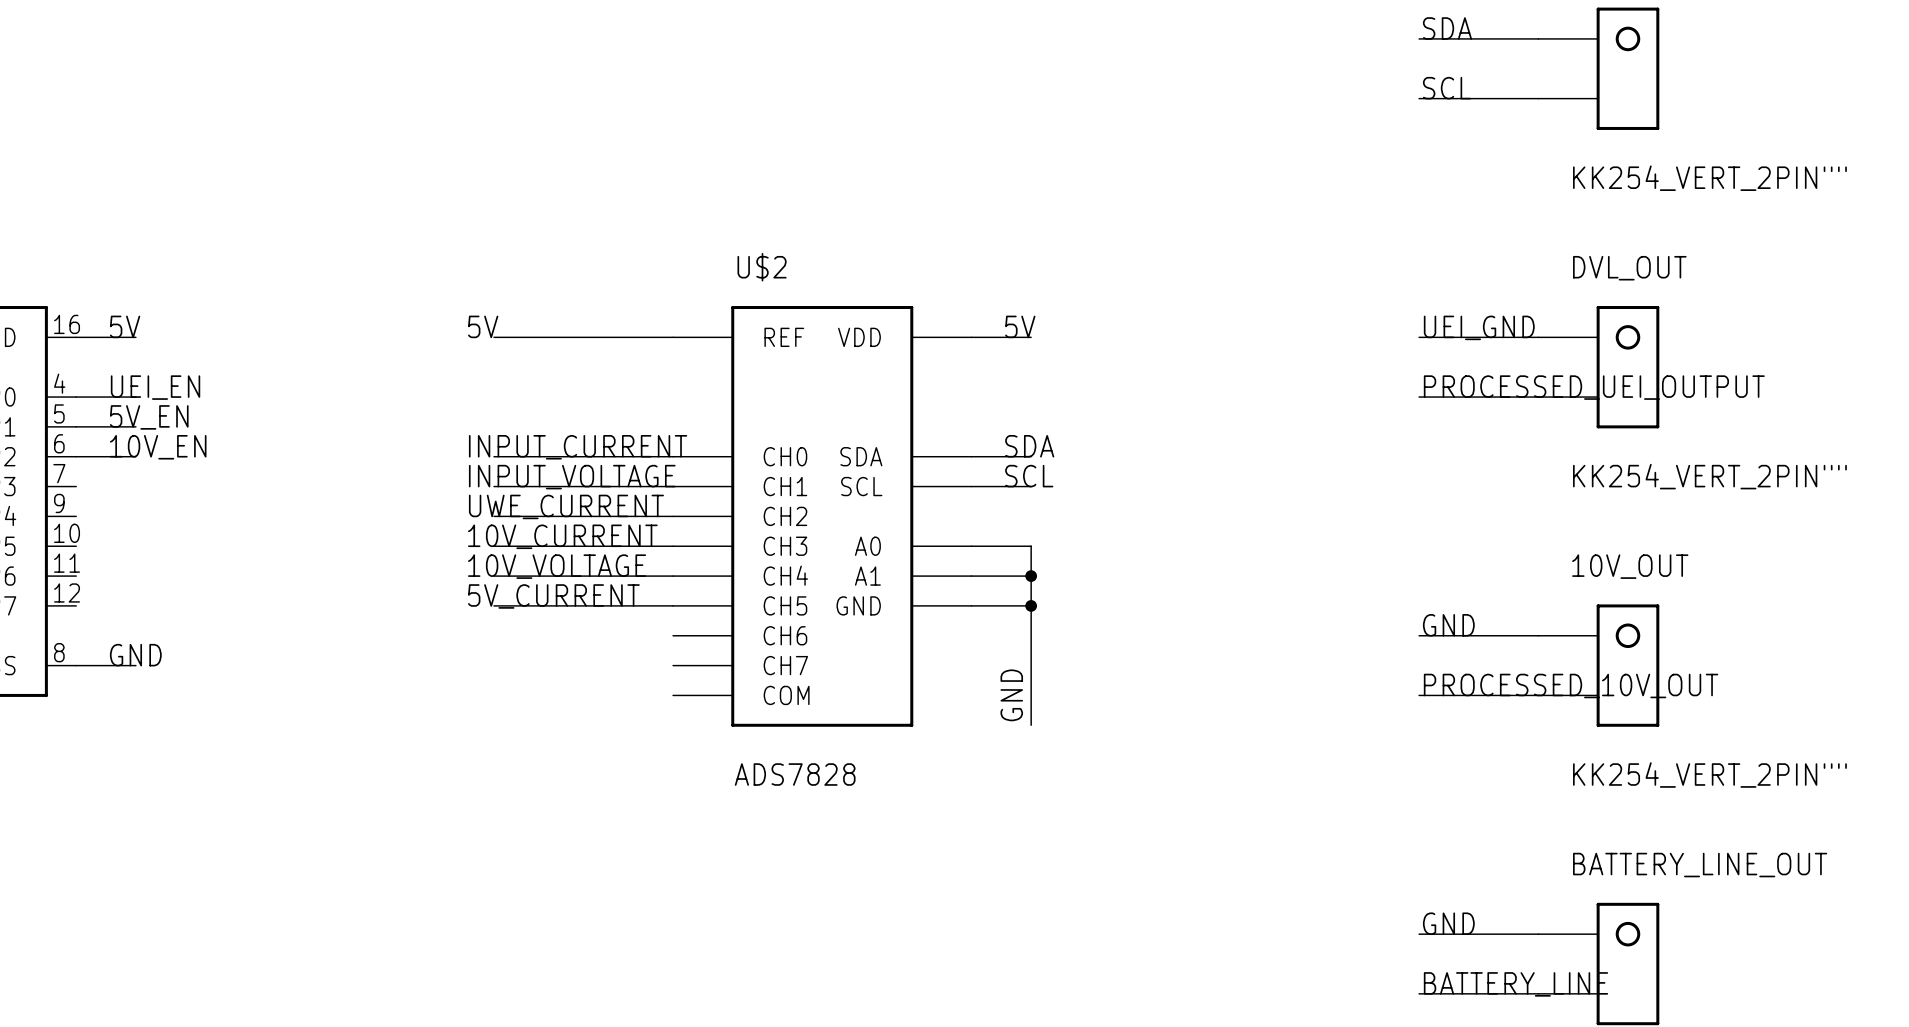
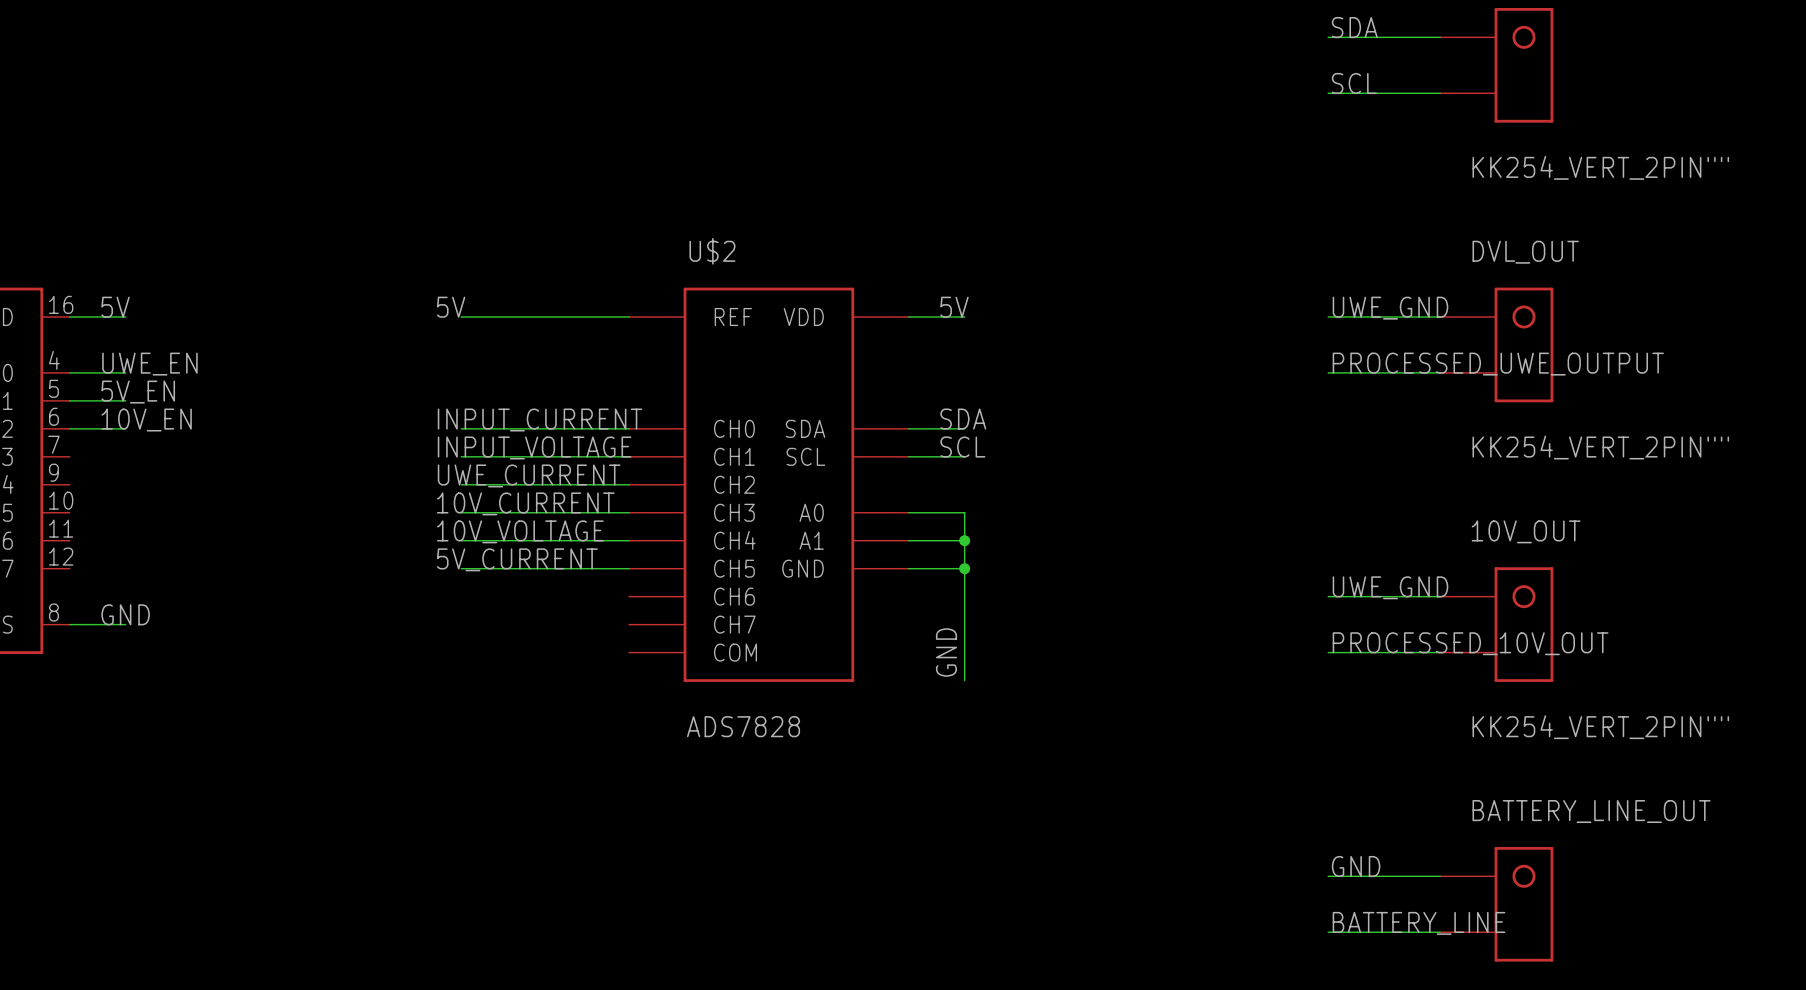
label: UEI_GND (1479, 327) -> UWE_GND (1390, 308)
label: UEI_EN (155, 387) -> UWE_EN (149, 364)
label: PROCESSED_UEI_OUTPUT (1594, 387) -> PROCESSED_UWE_OUTPUT (1498, 364)
label: GND (1448, 625) -> UWE_GND (1390, 587)

